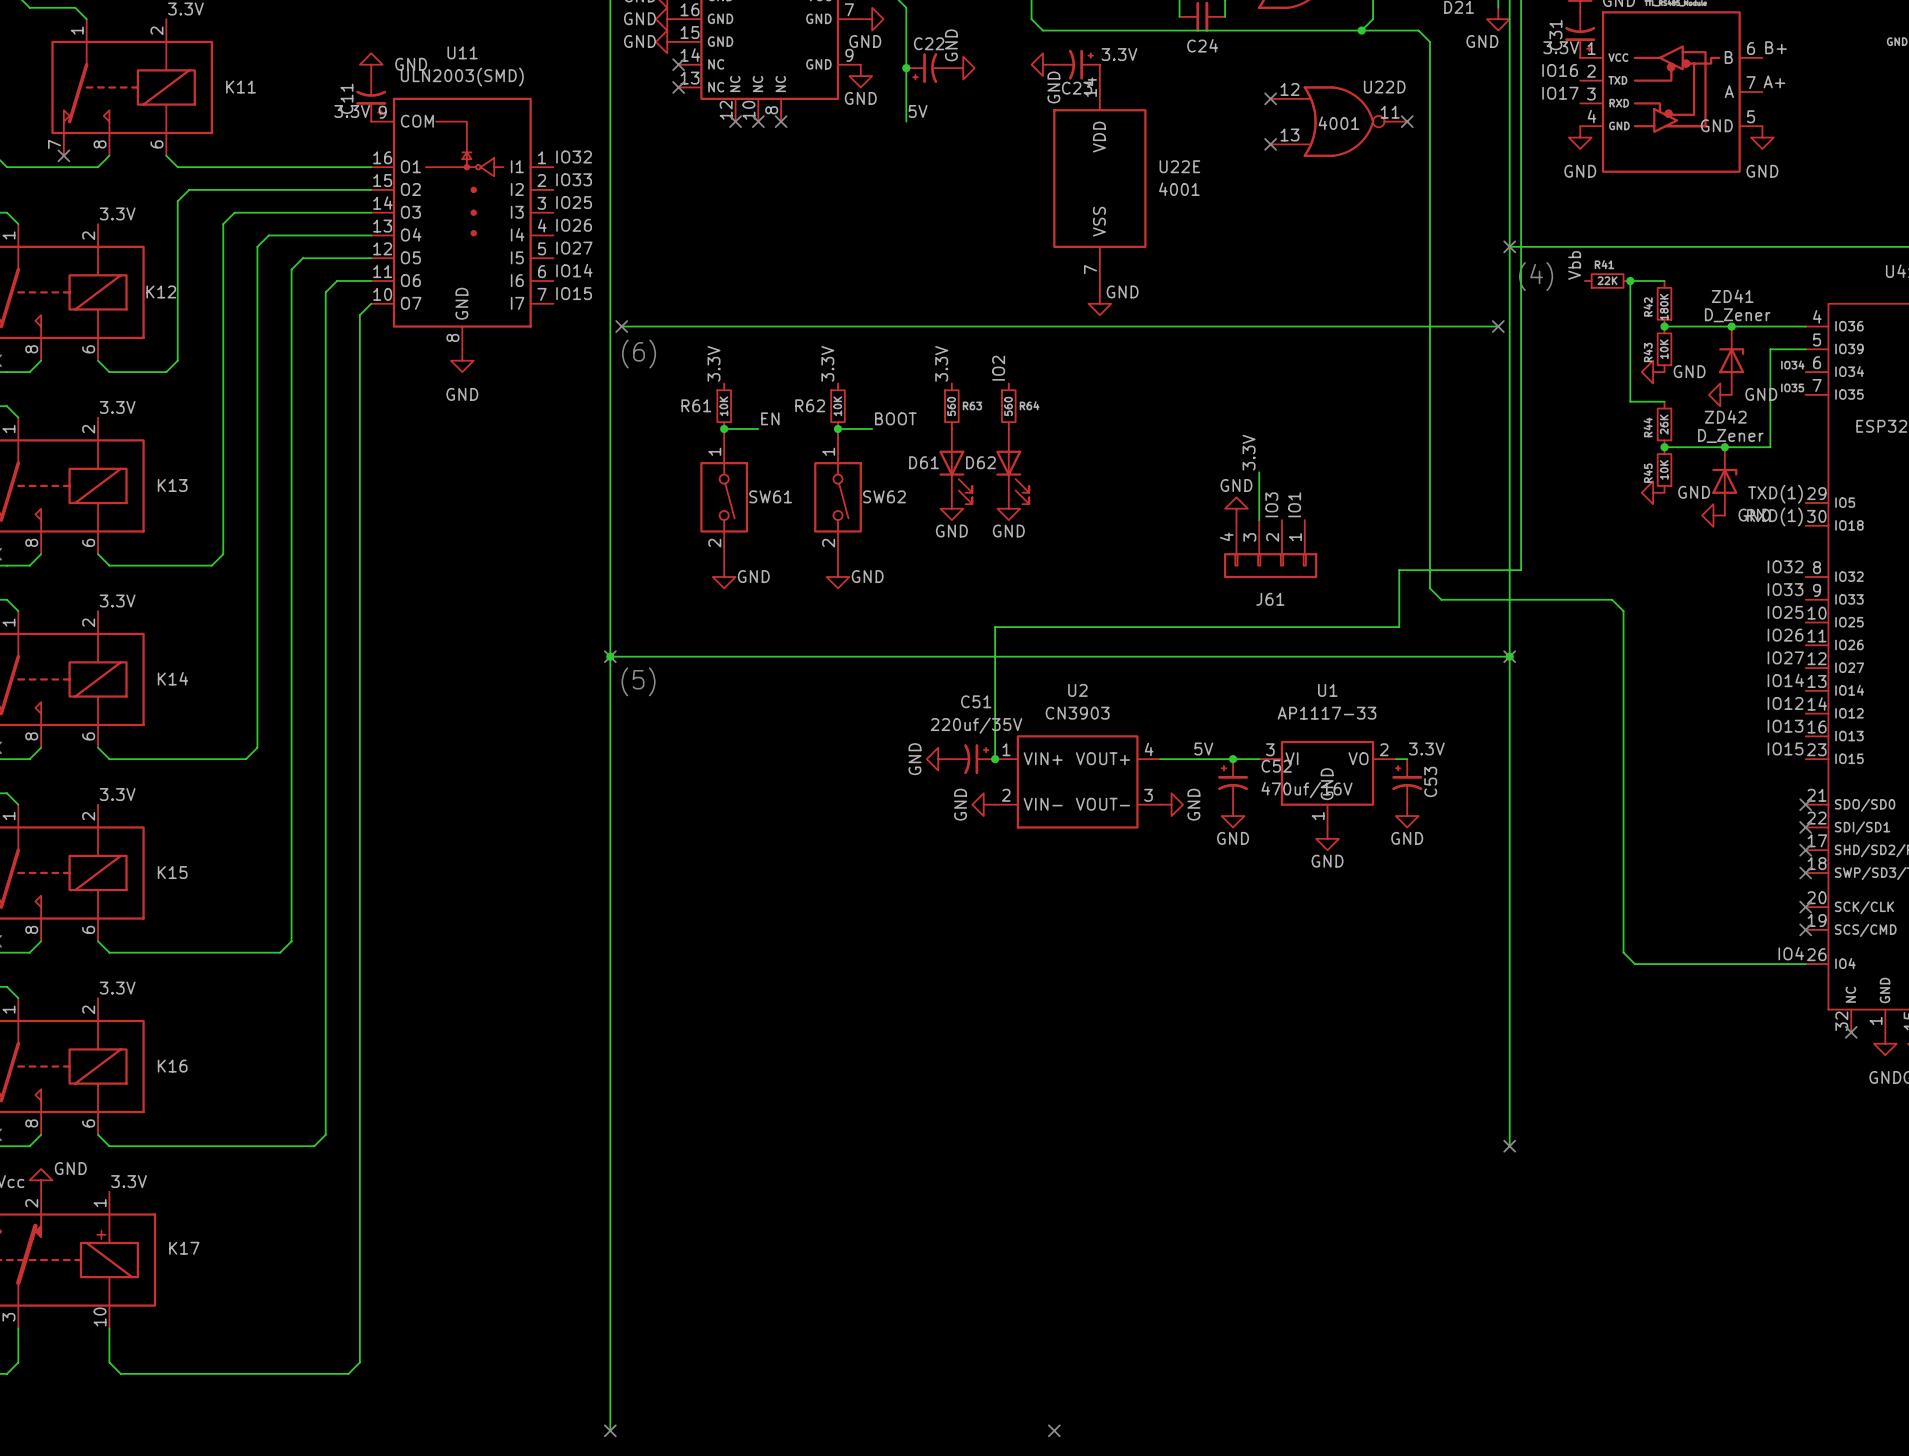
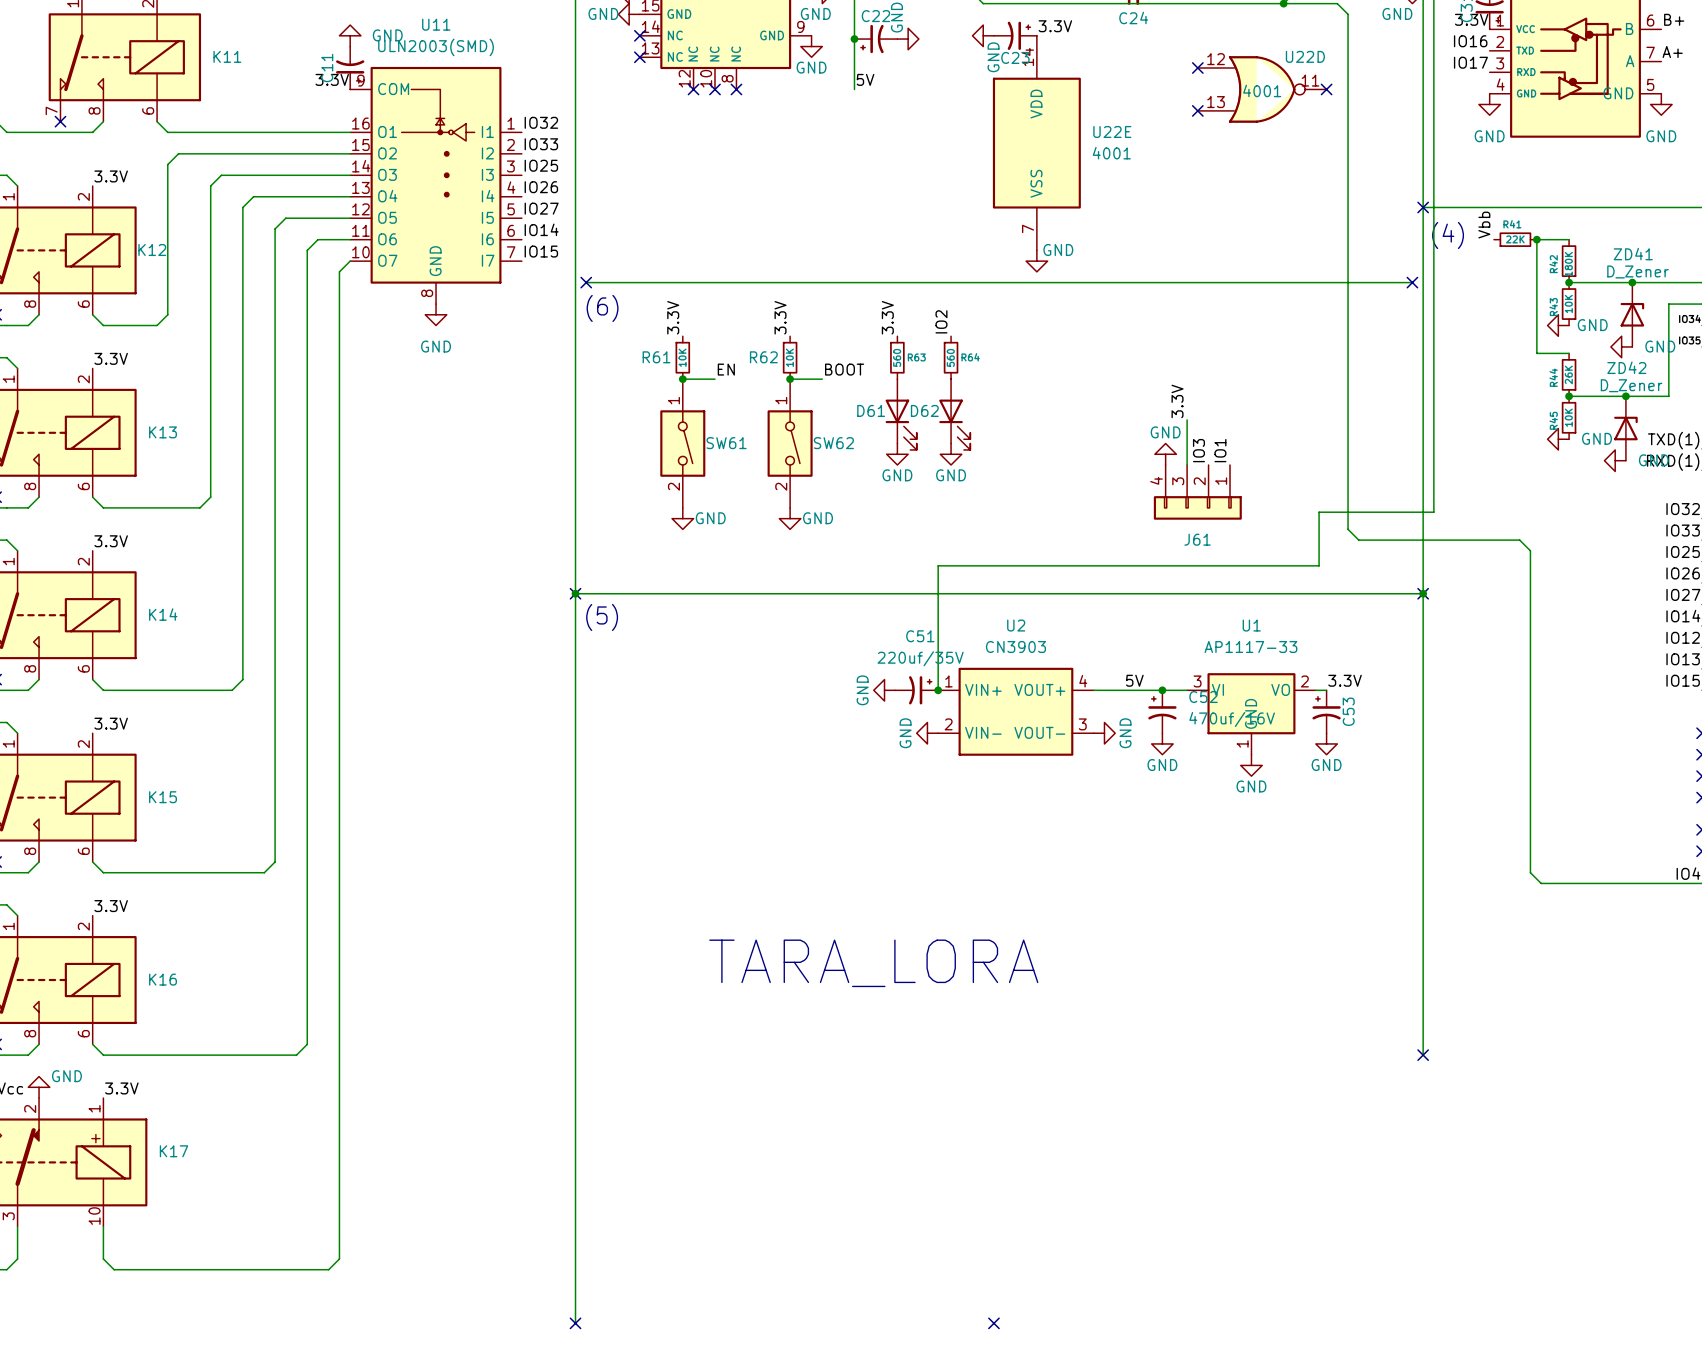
text: none -> TARA_LORA (873, 963)

